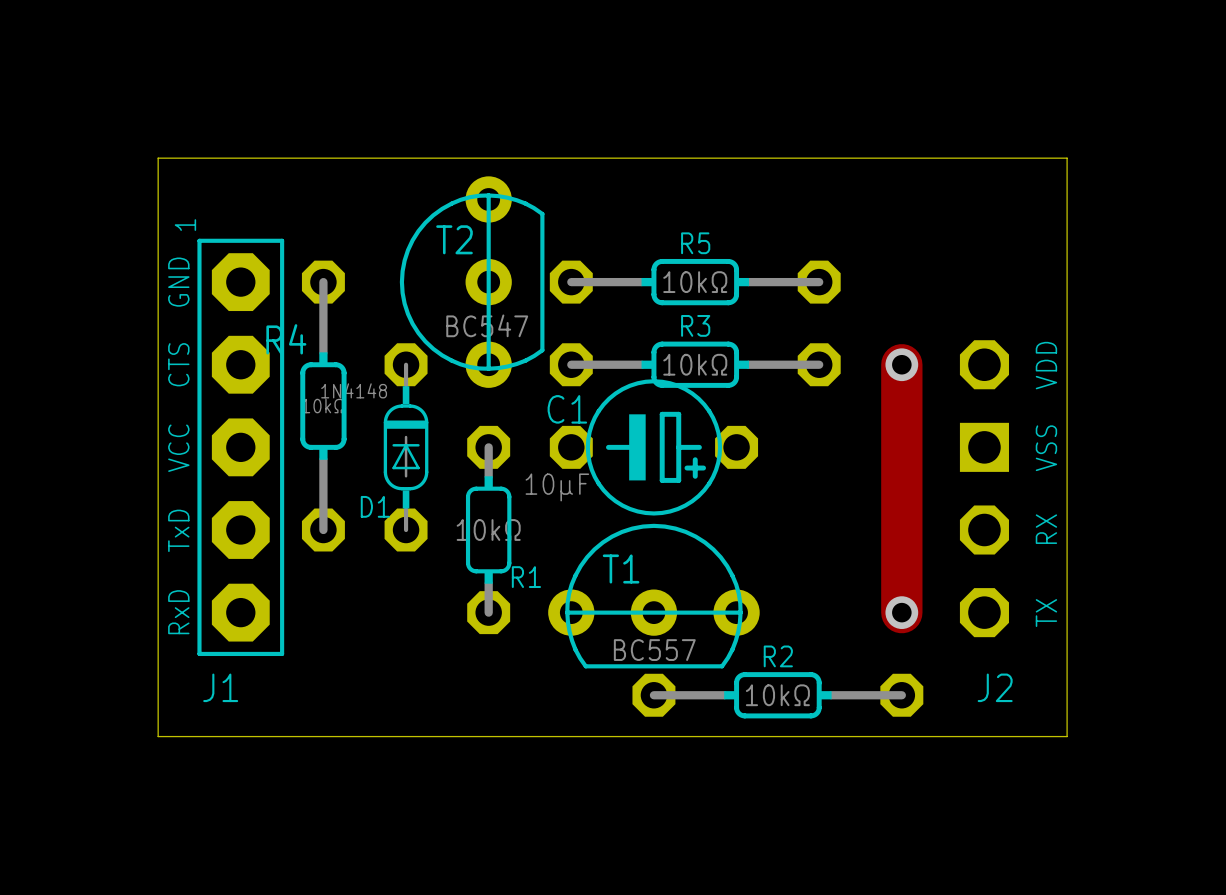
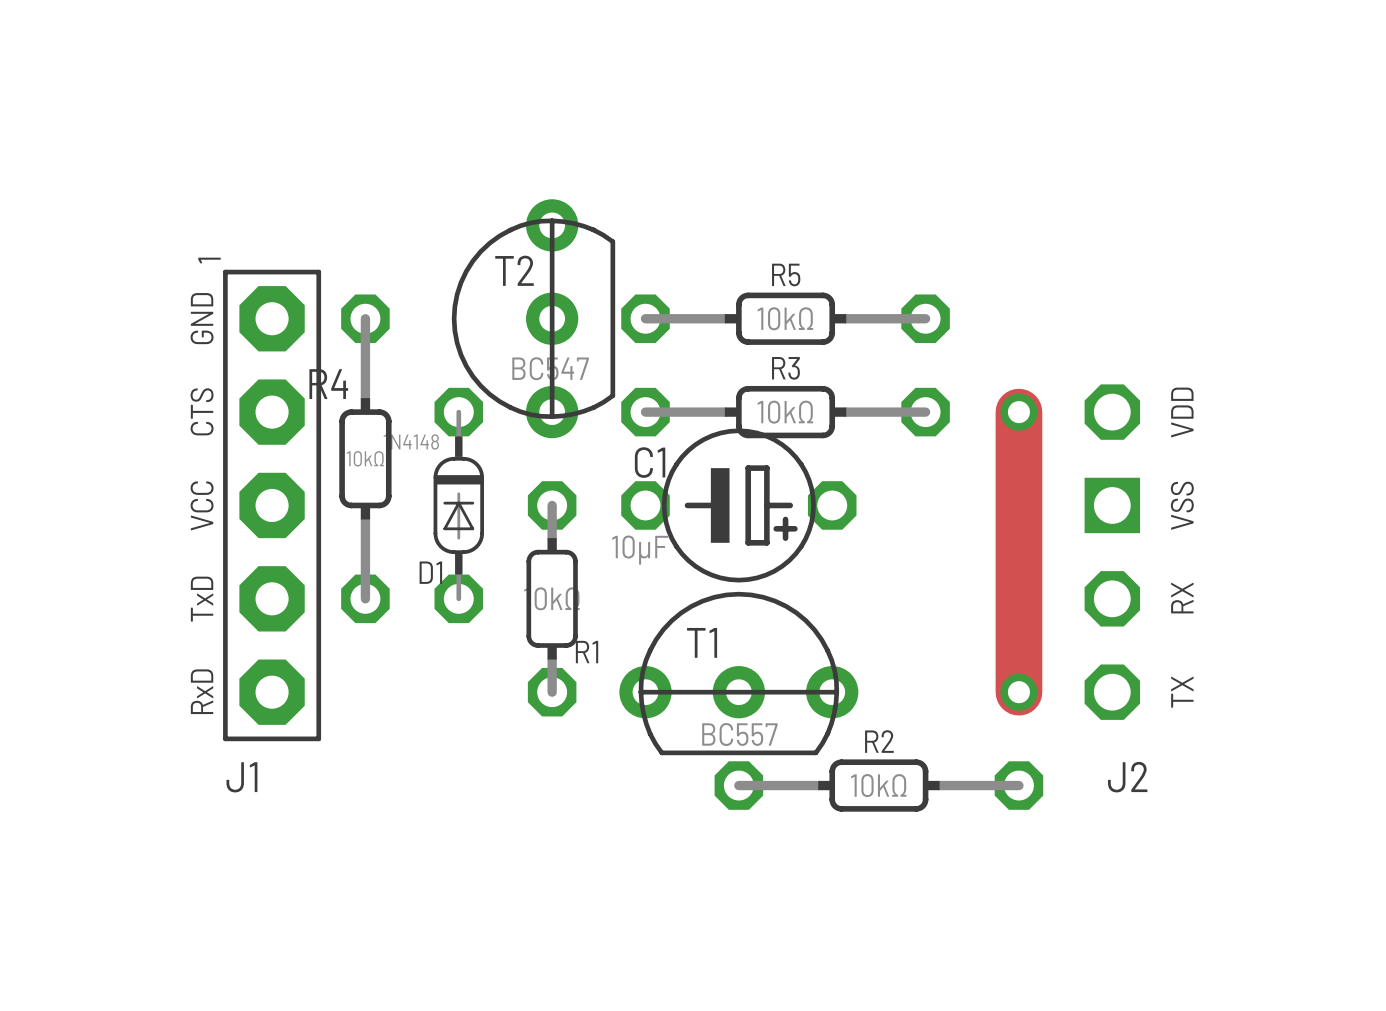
board edge: (158, 158) (1067, 158) (1067, 736) (158, 736) (158, 158) -> none

